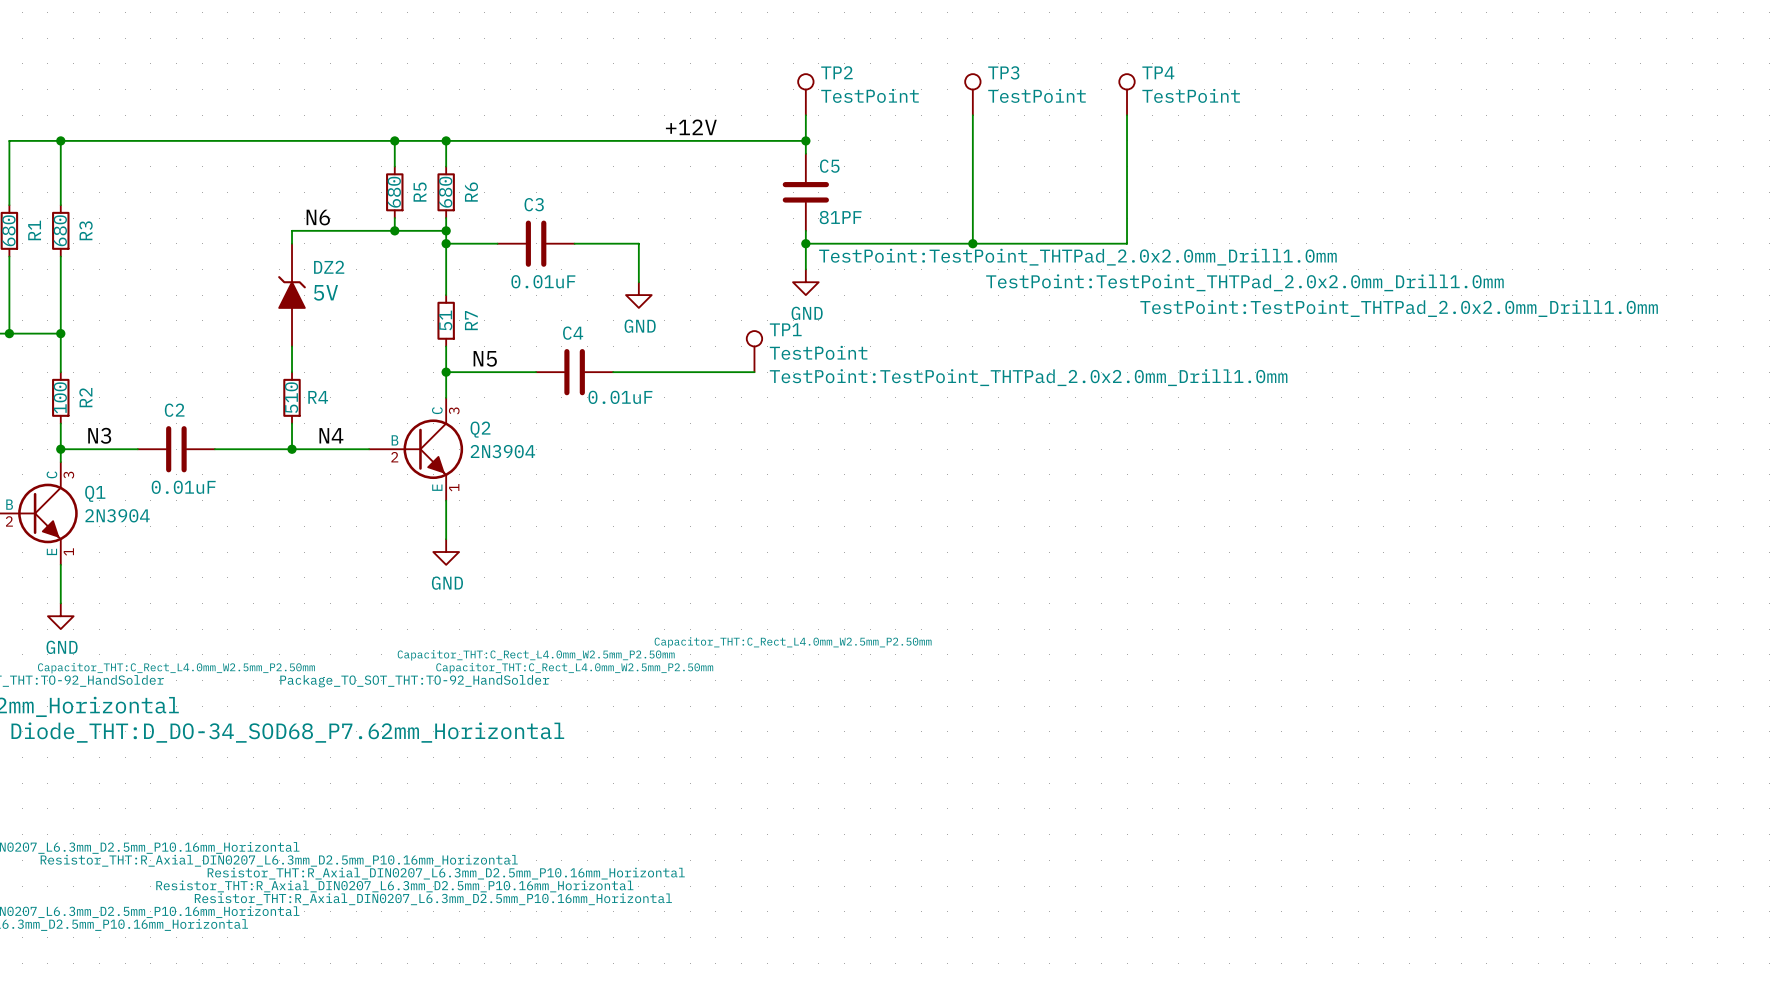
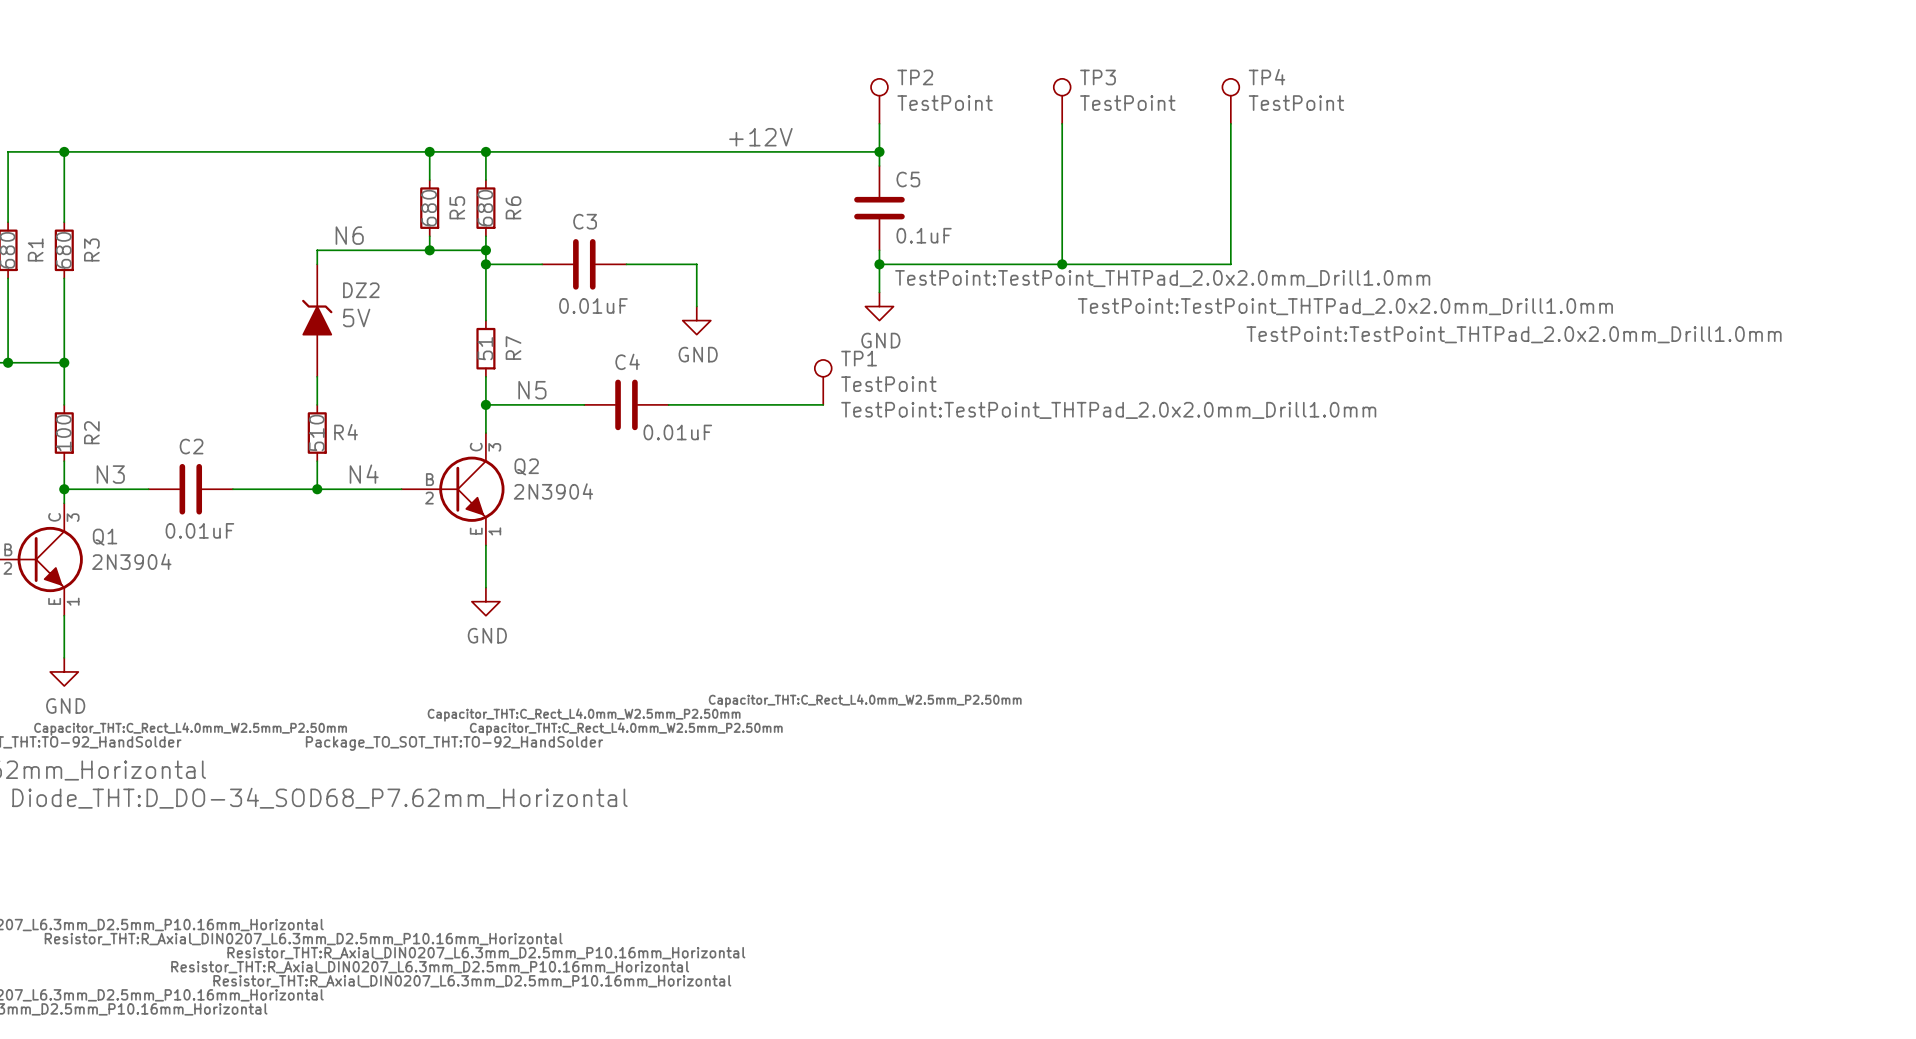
C5 value: 81PF (840, 217) -> 0.1uF (924, 235)

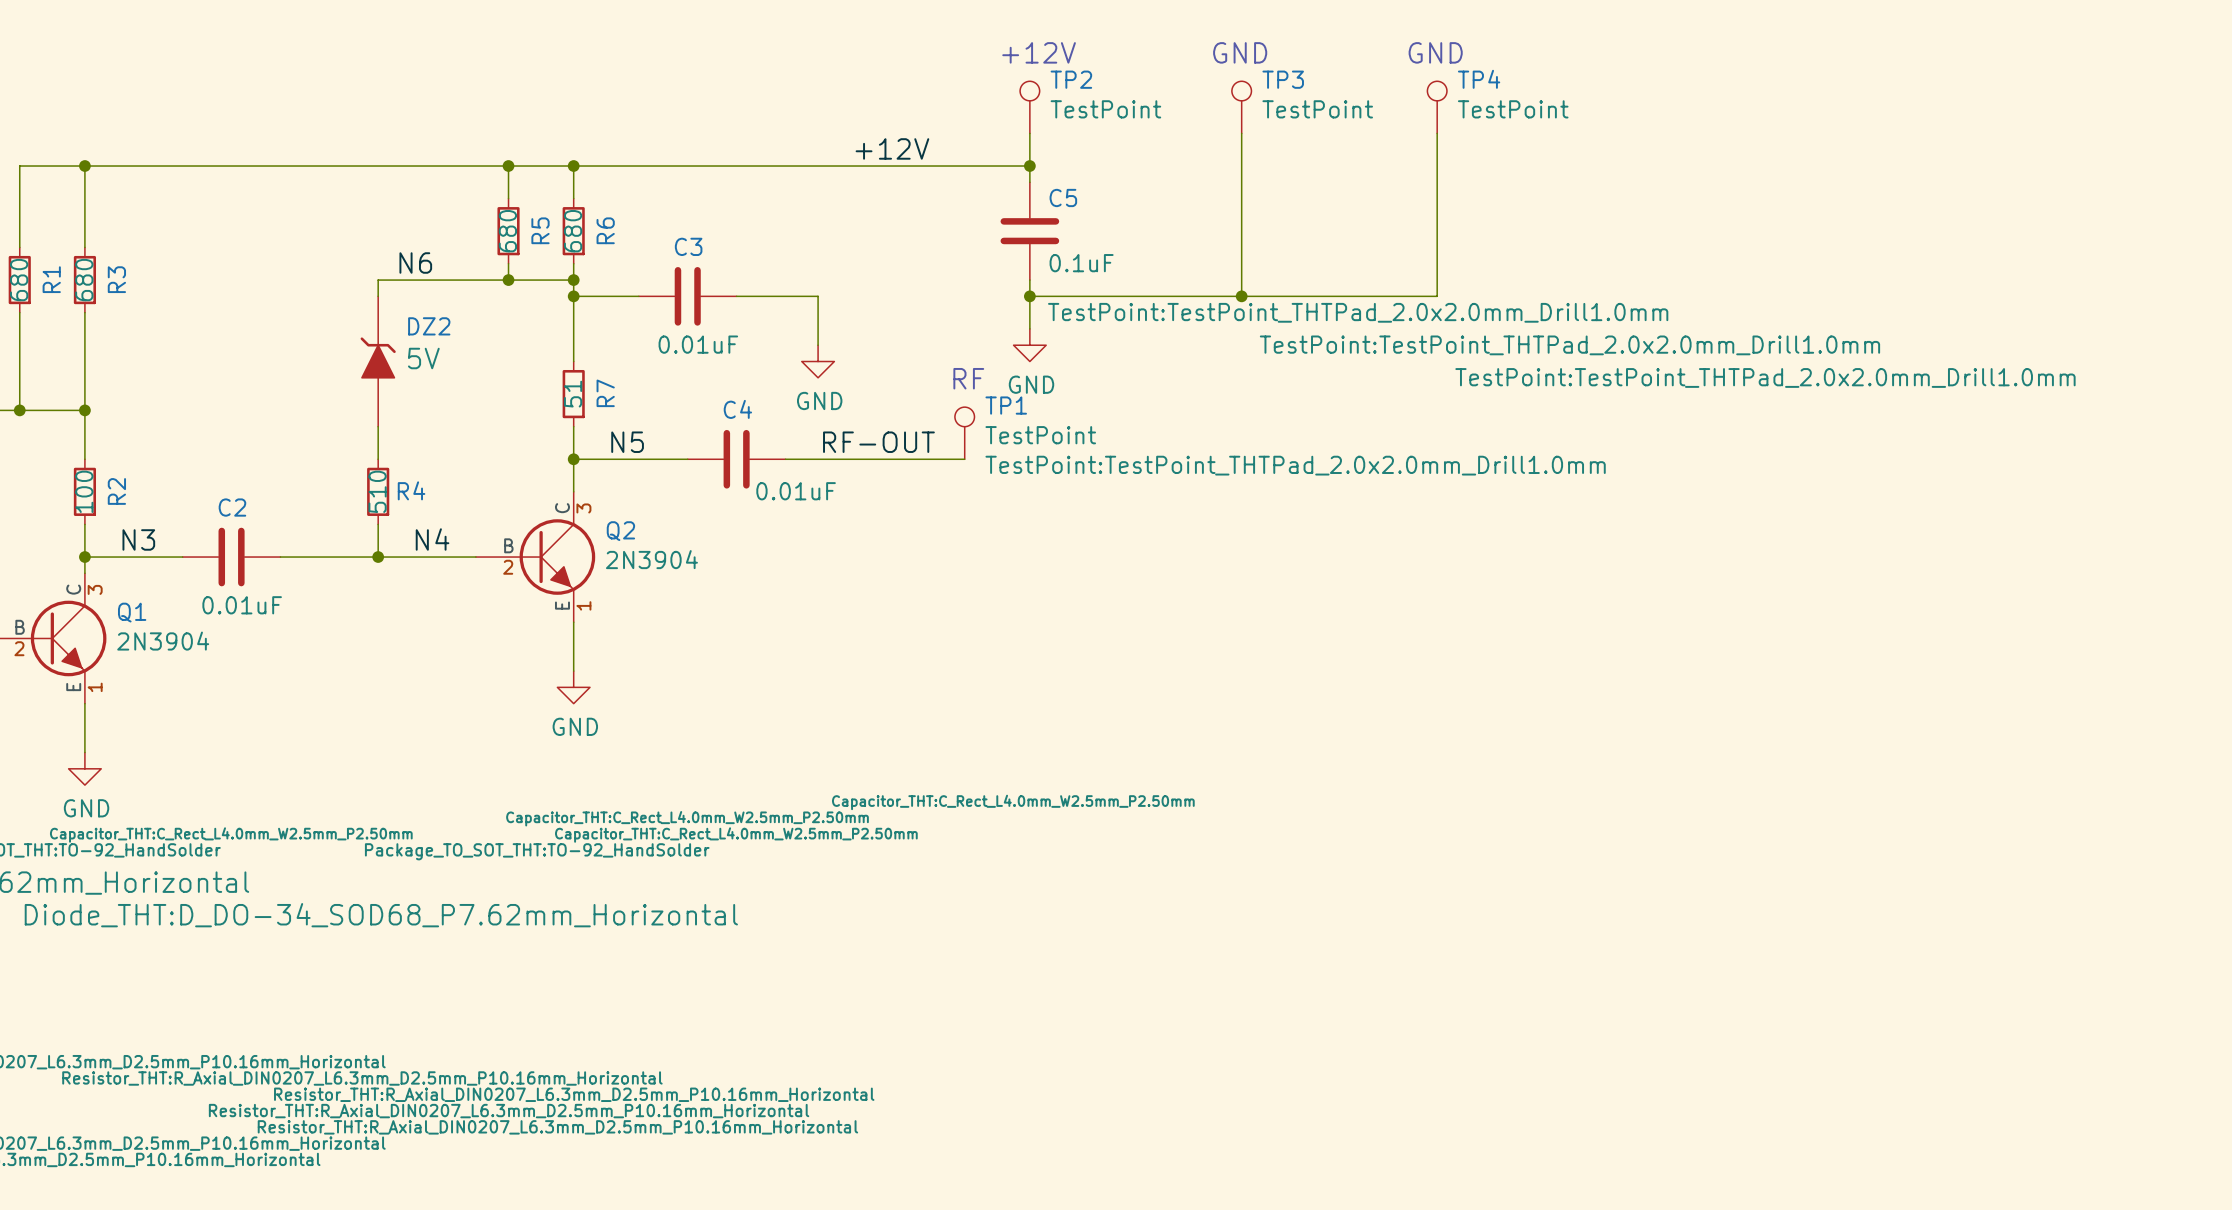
text: none -> +12V (1039, 52)
text: none -> GND (1240, 52)
text: none -> GND (1435, 52)
text: none -> RF (968, 378)
label: none -> RF-OUT (878, 442)

